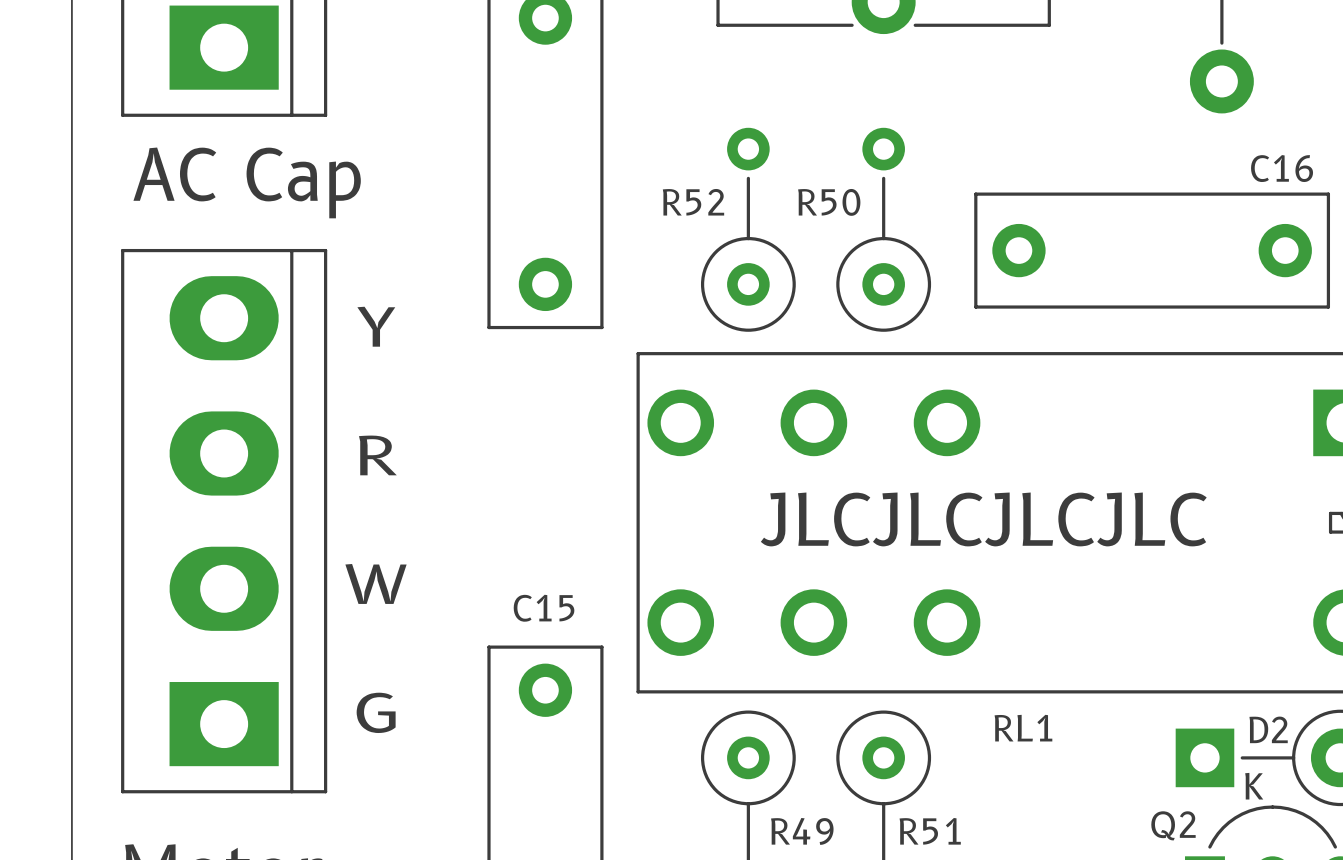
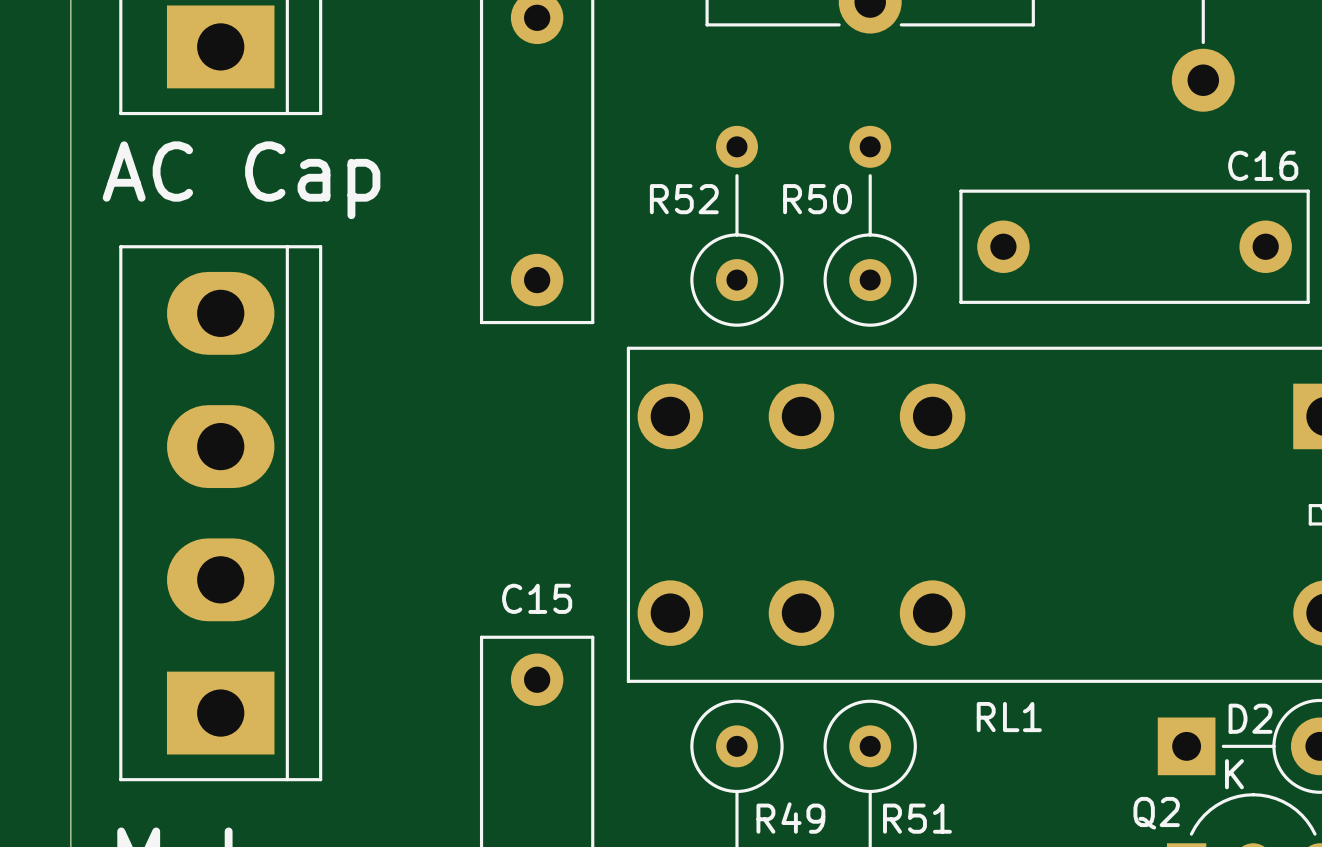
text: Y (376, 326) -> none
text: R (377, 455) -> none
text: JLCJLCJLCJLC (983, 519) -> none
text: W (376, 583) -> none
text: G (376, 712) -> none

